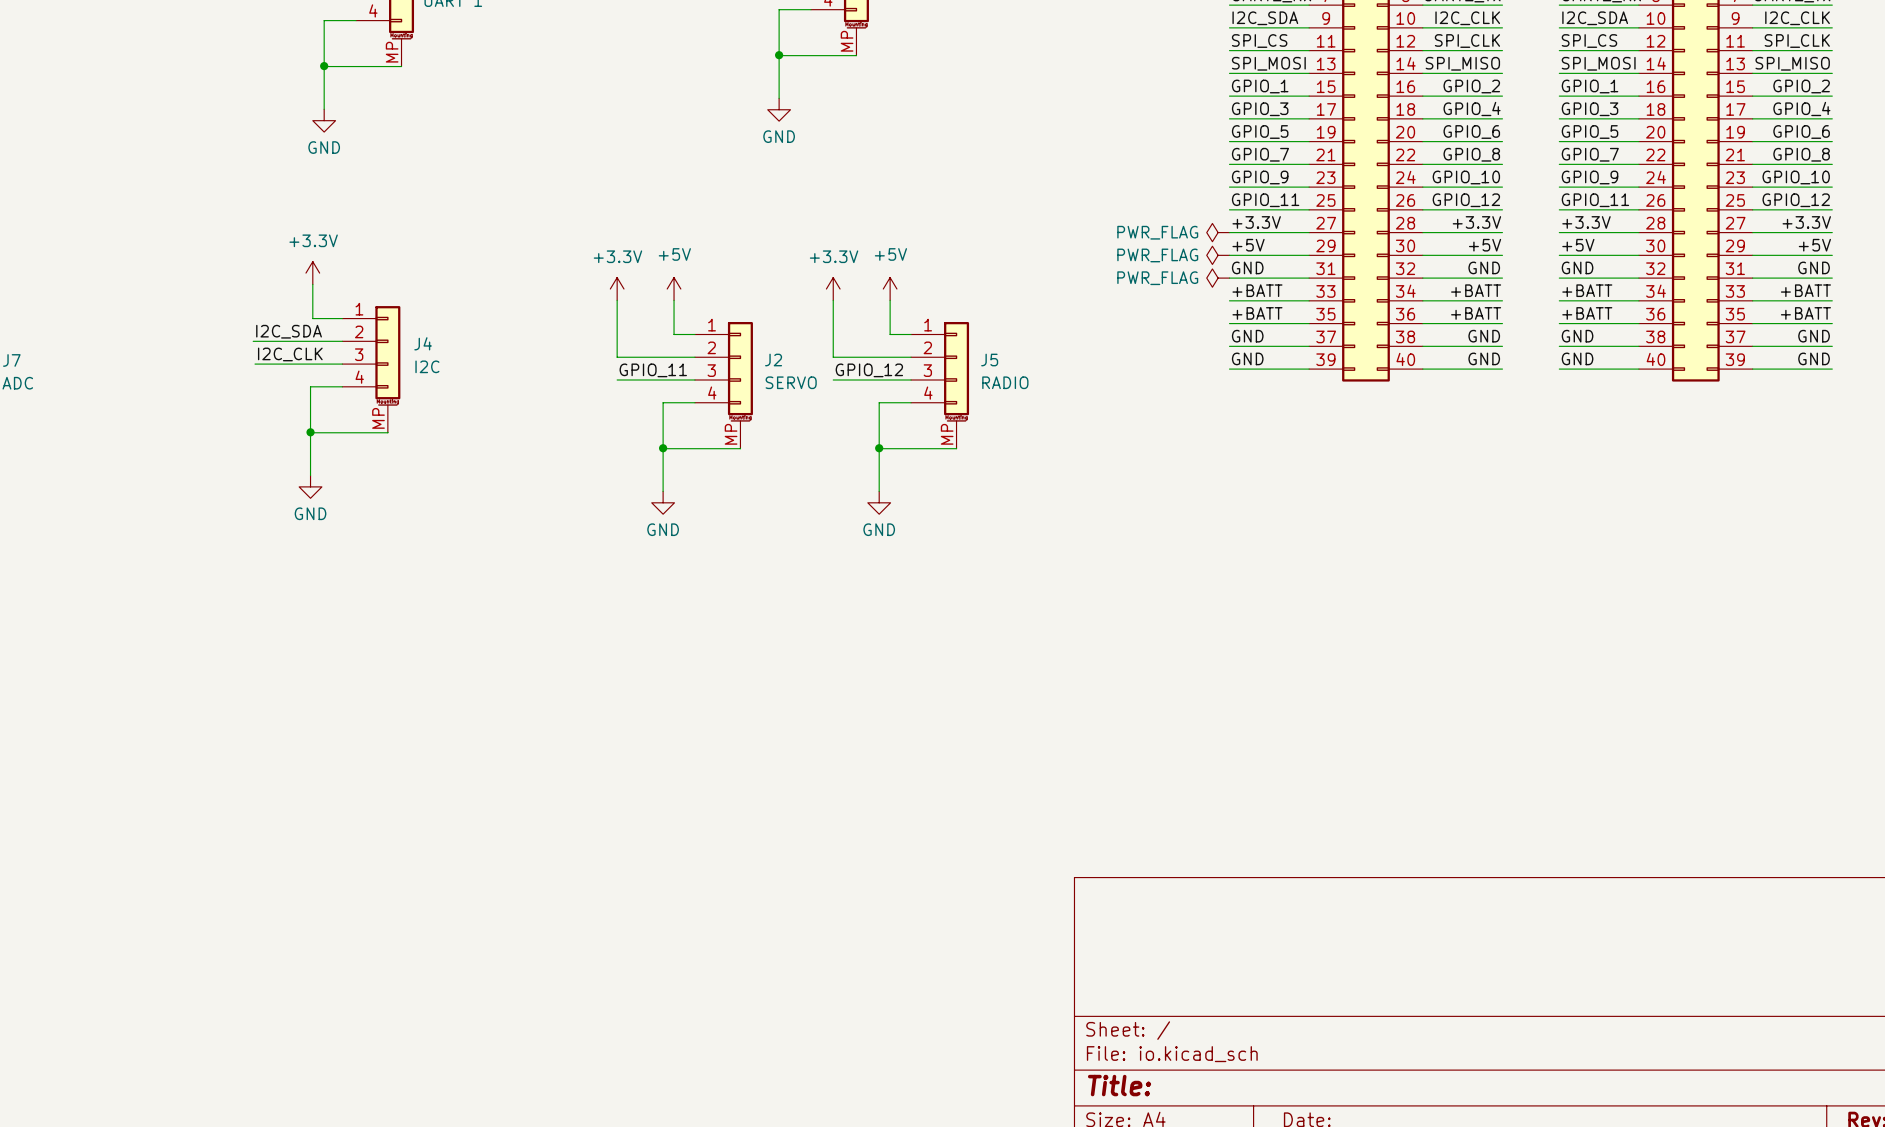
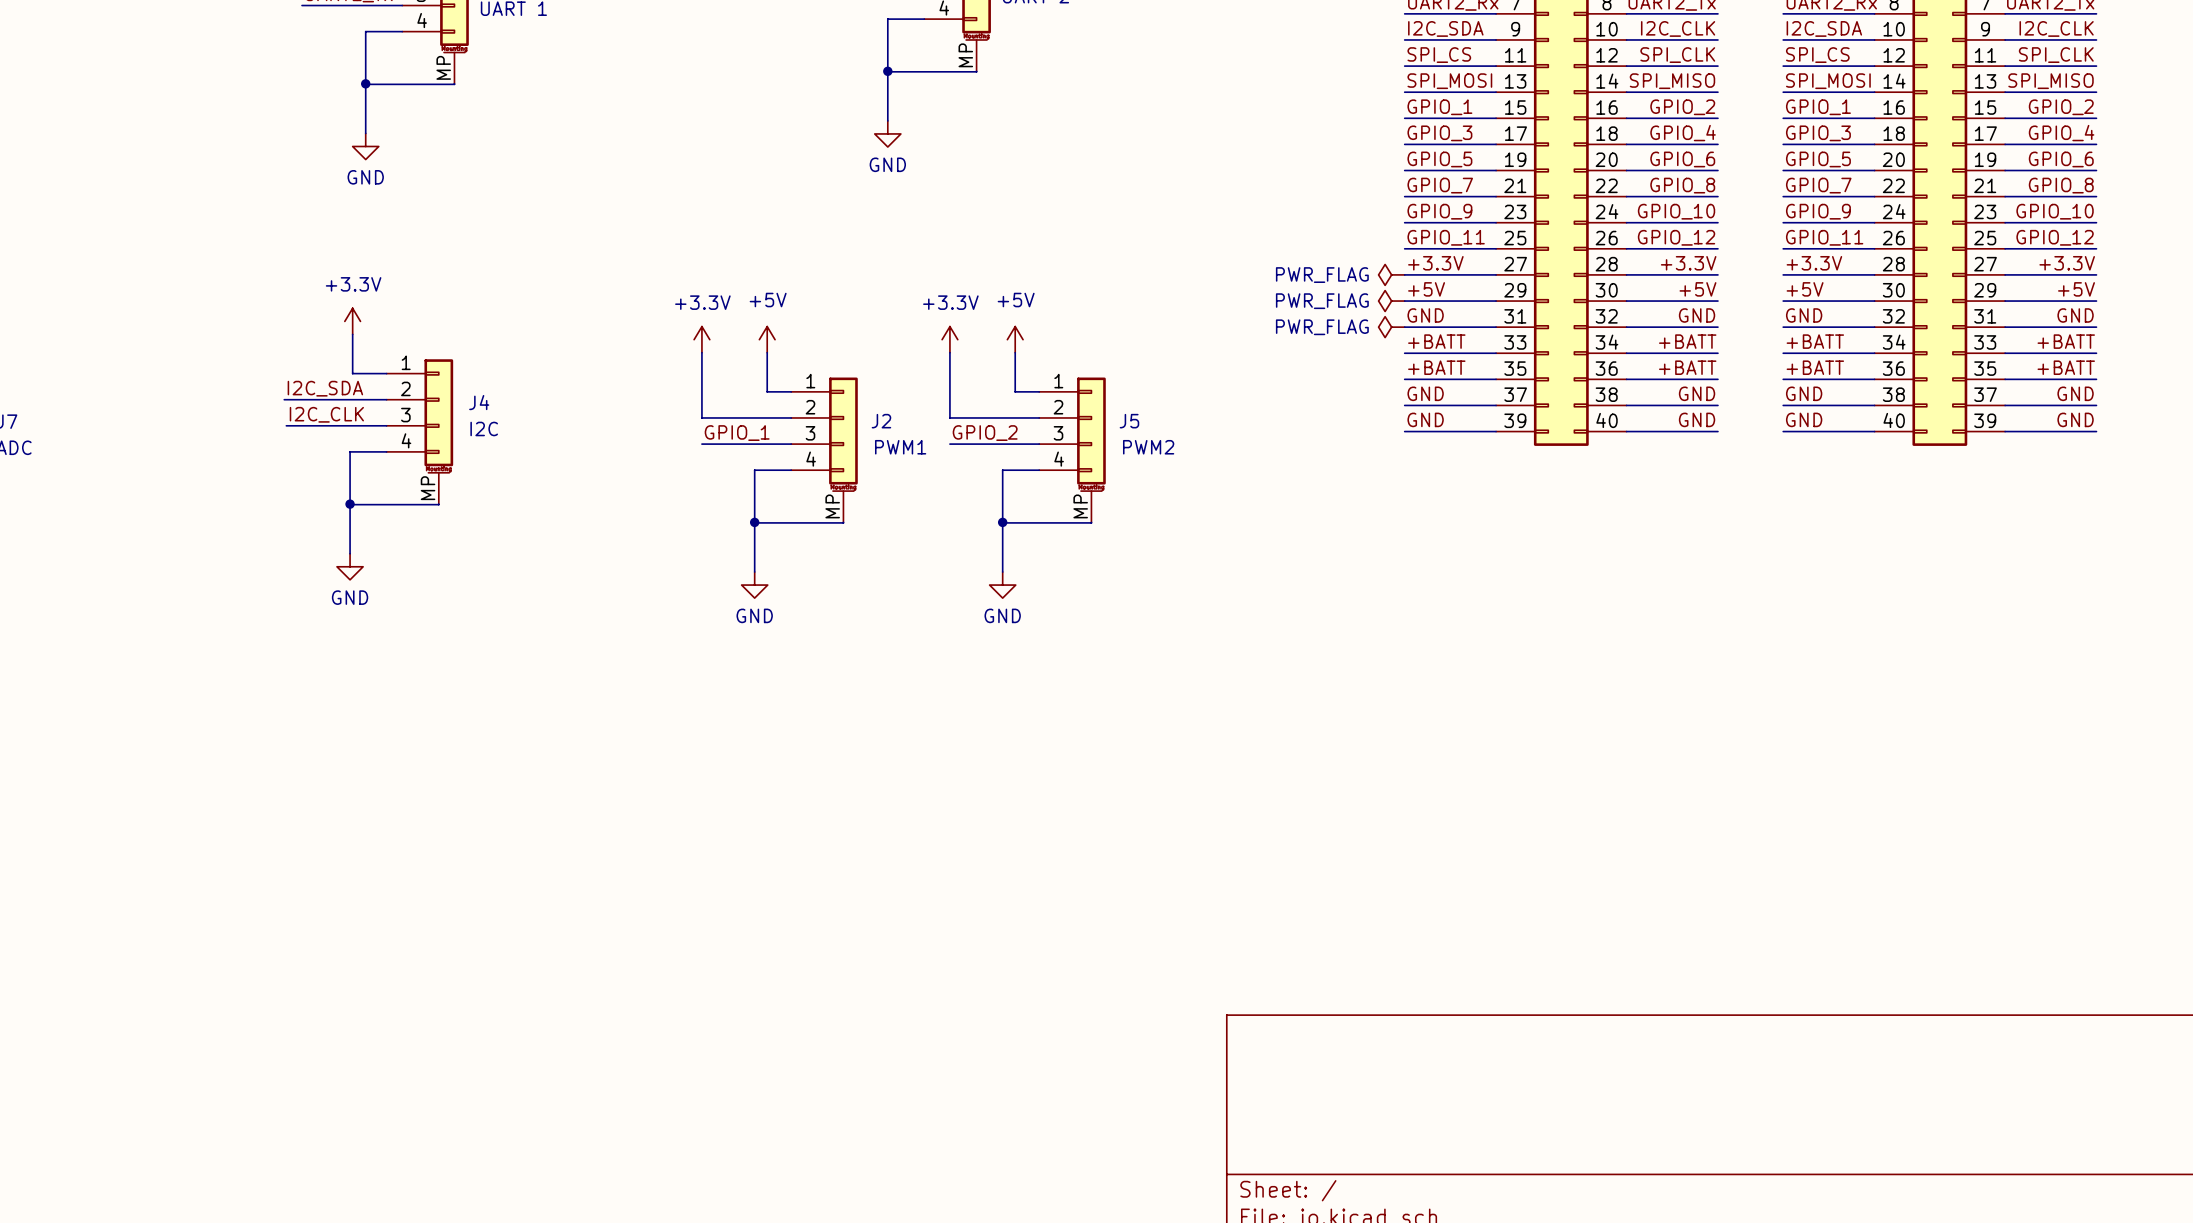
label: GPIO_11 (653, 370) -> GPIO_1 (737, 433)
label: GPIO_12 (869, 370) -> GPIO_2 (985, 433)
J2 value: SERVO (791, 382) -> PWM1 (900, 447)
J5 value: RADIO (1005, 382) -> PWM2 (1148, 447)

